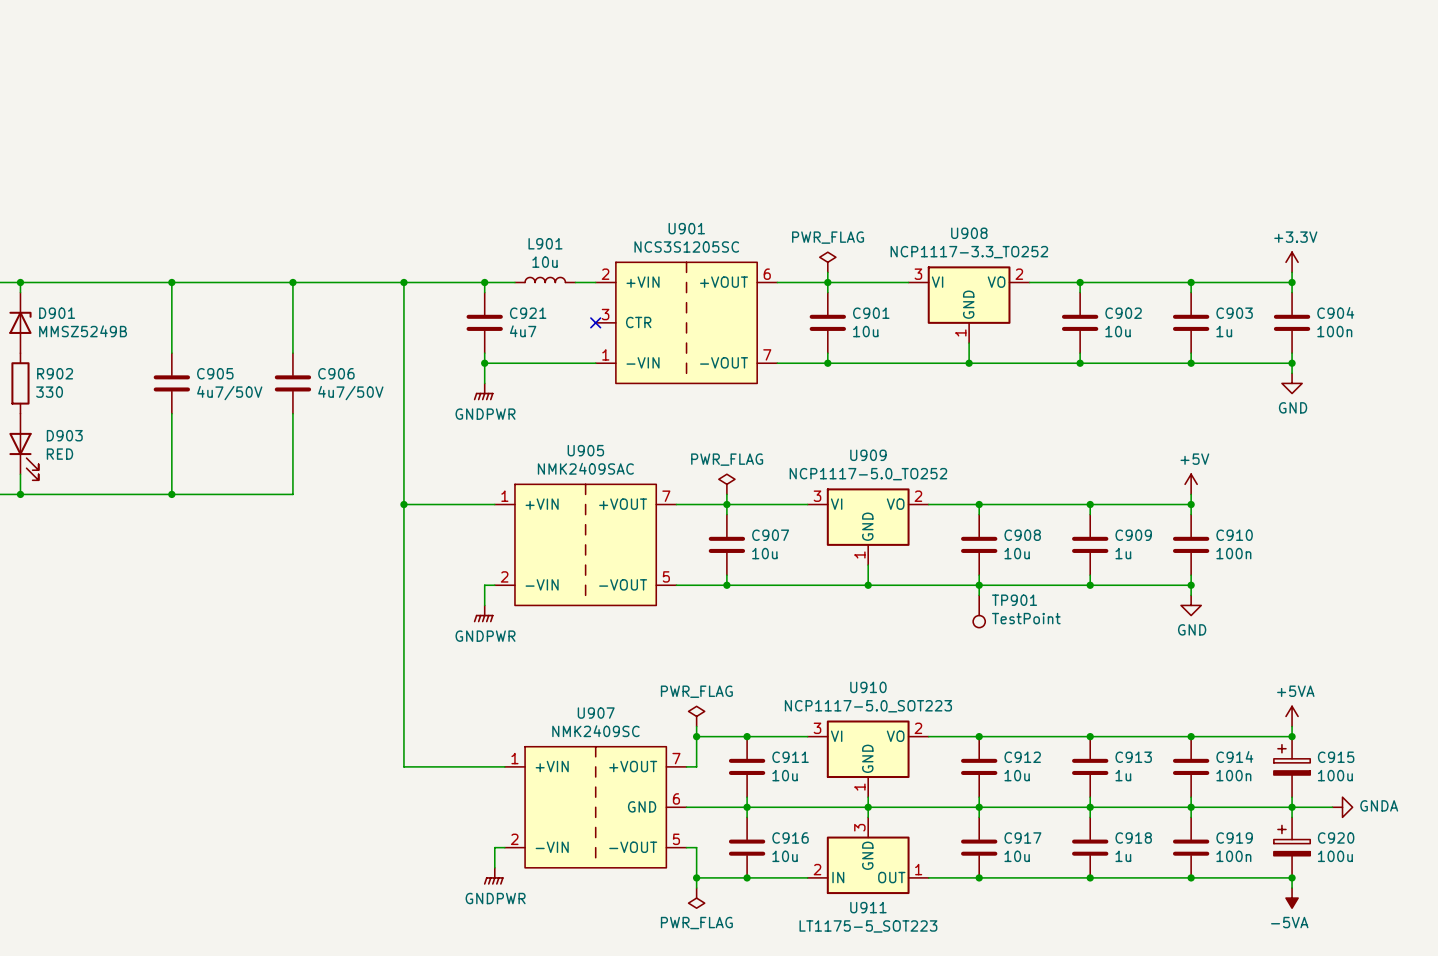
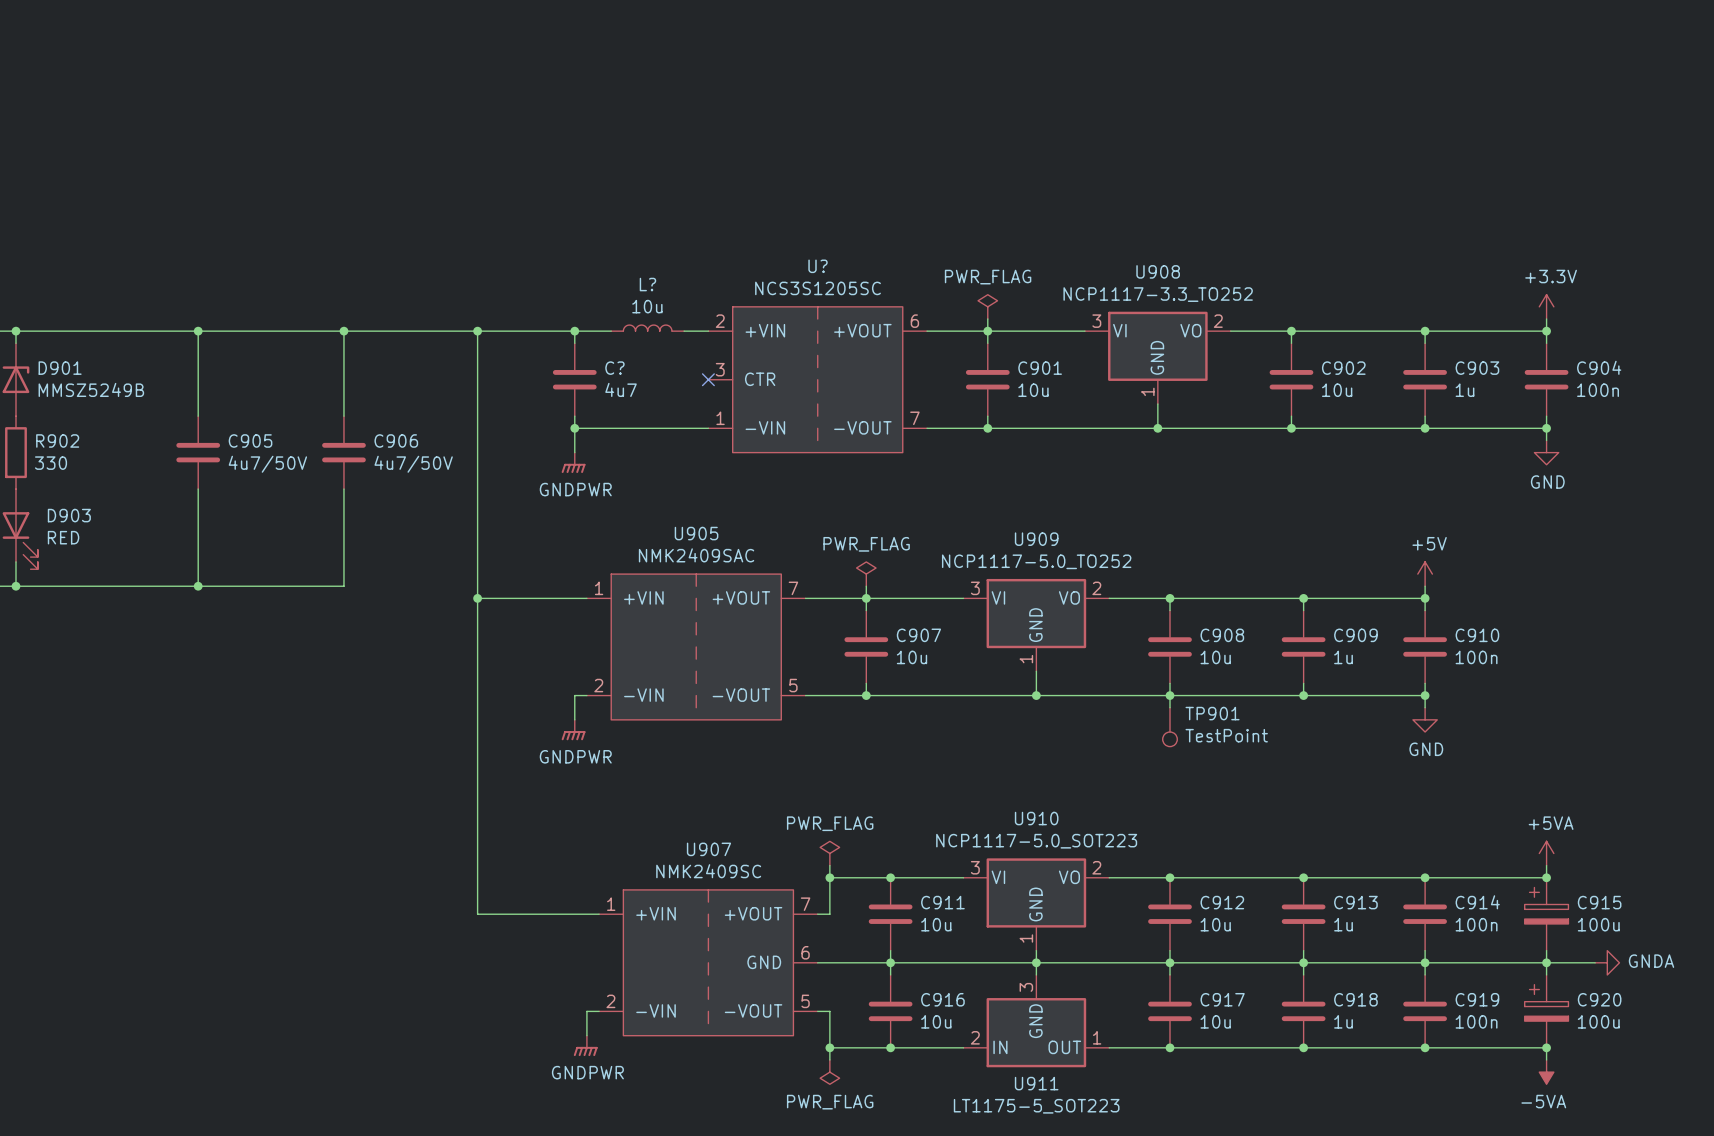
U901 name: U901 (686, 228) -> U? (818, 266)
L901 name: L901 (545, 243) -> L? (647, 284)
C921 name: C921 (528, 313) -> C? (614, 368)

